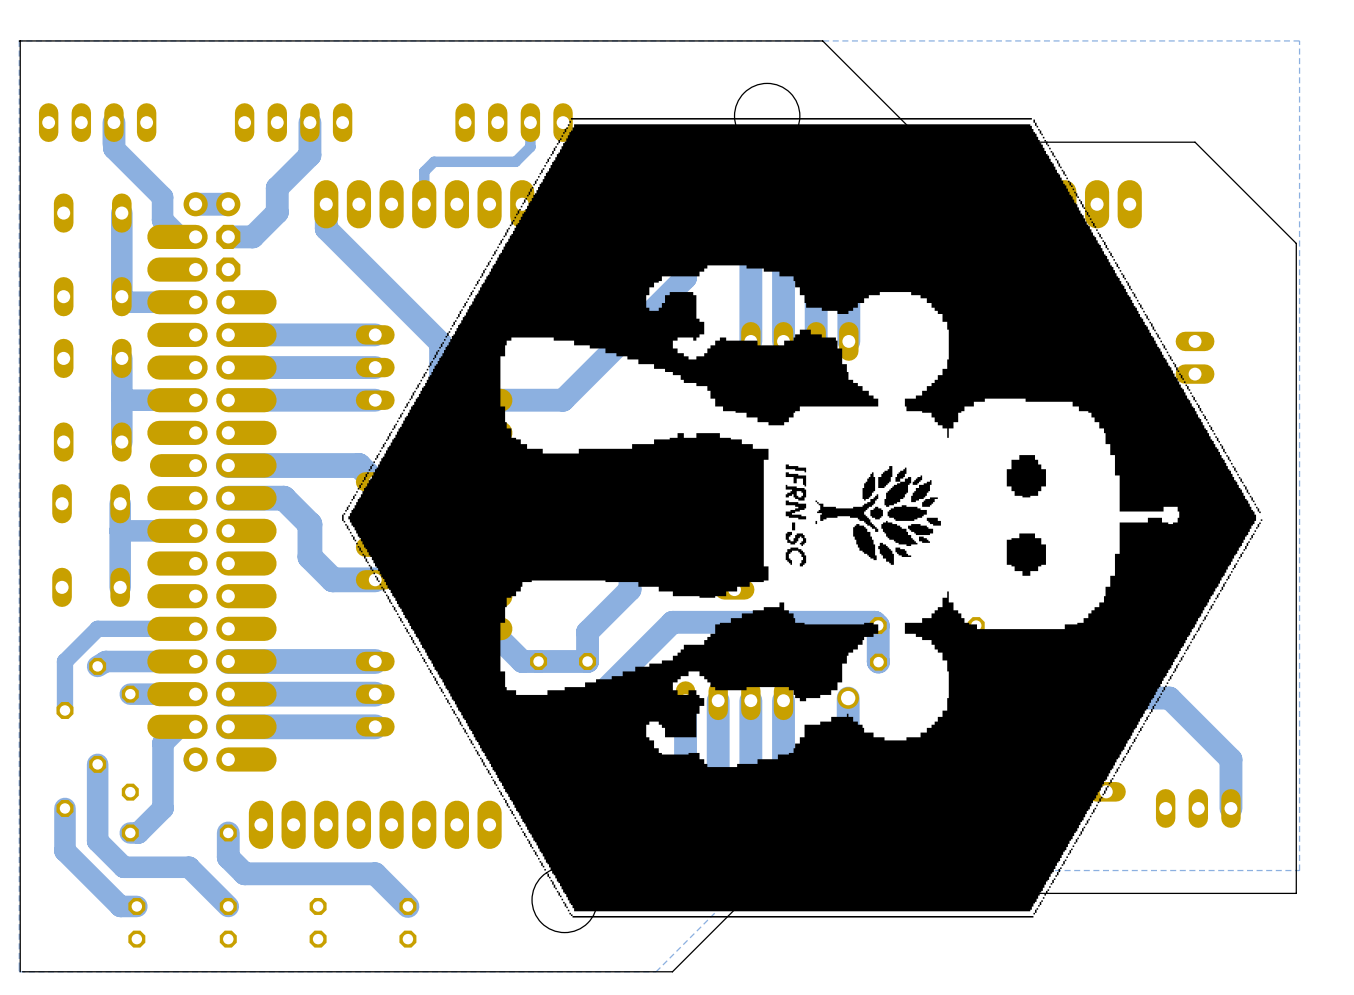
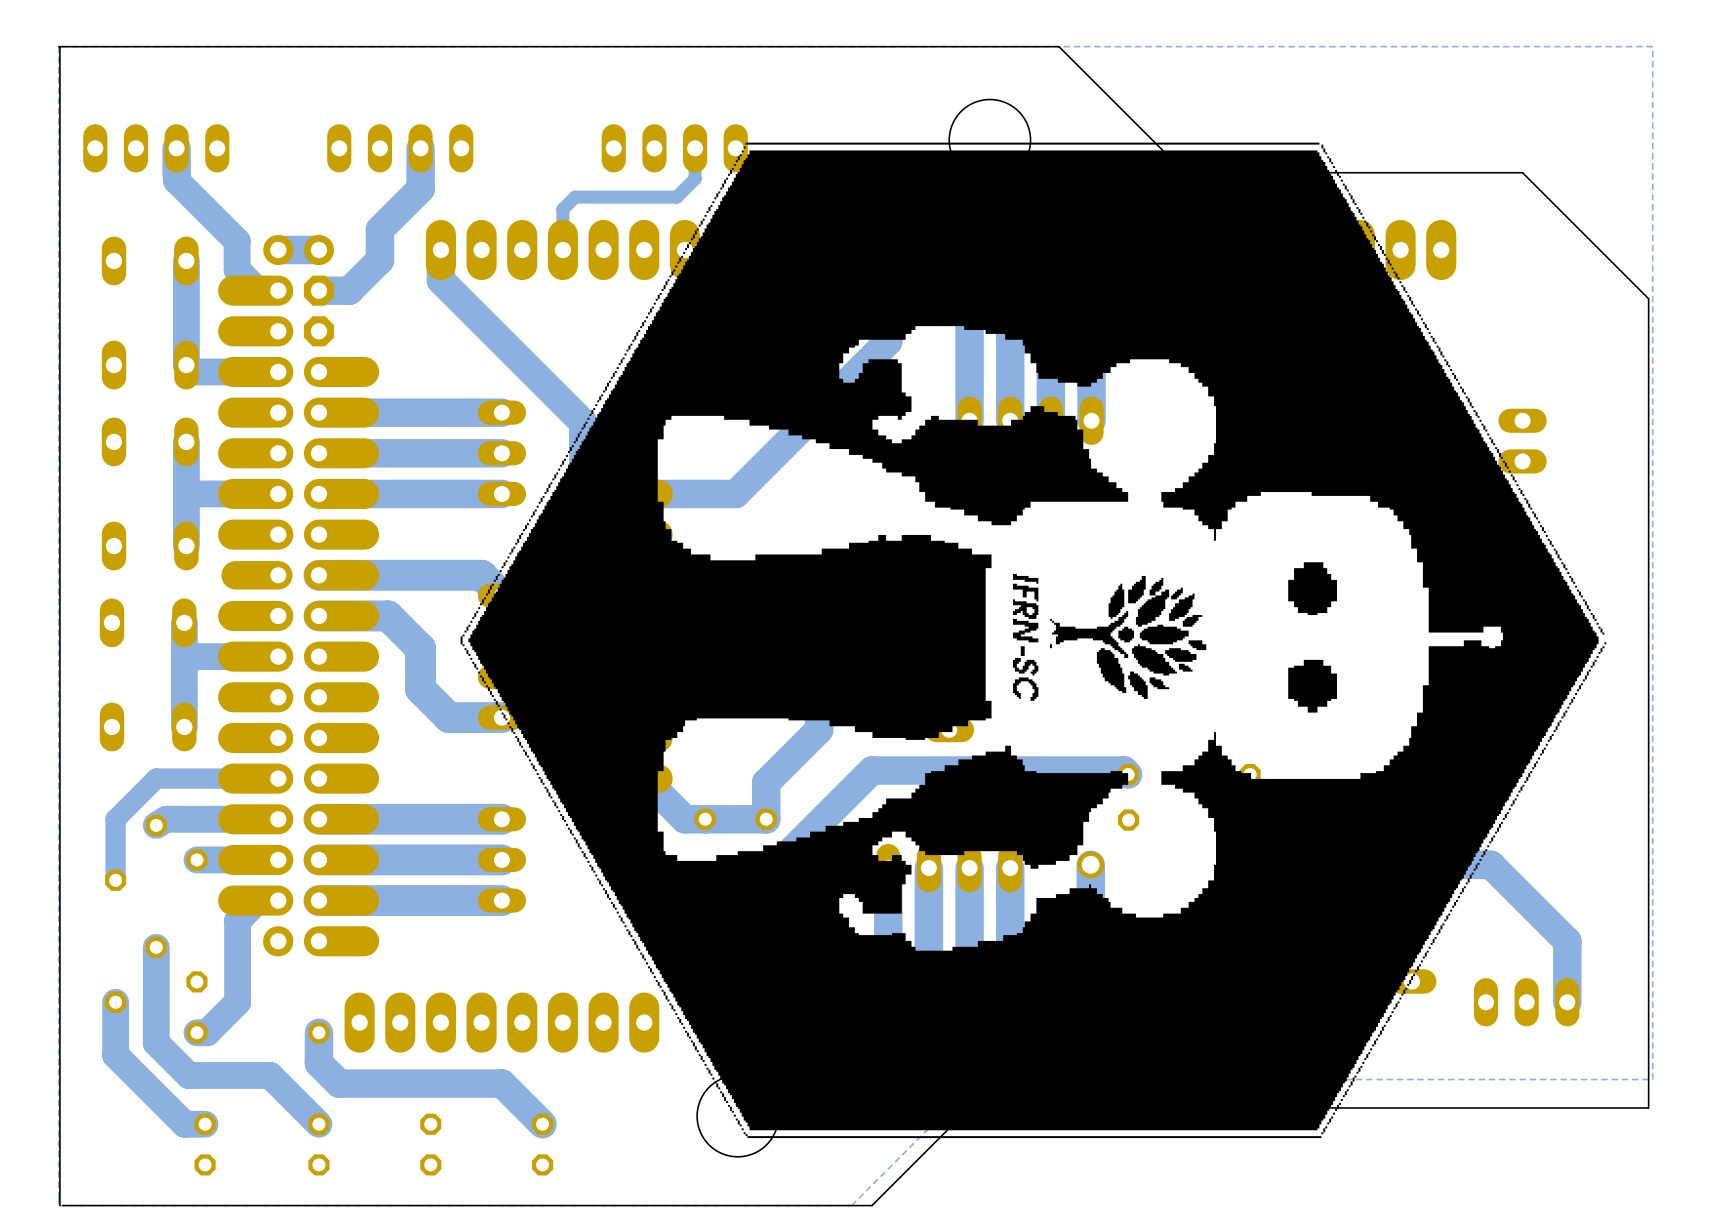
track: (878, 625) (878, 662) -> none

